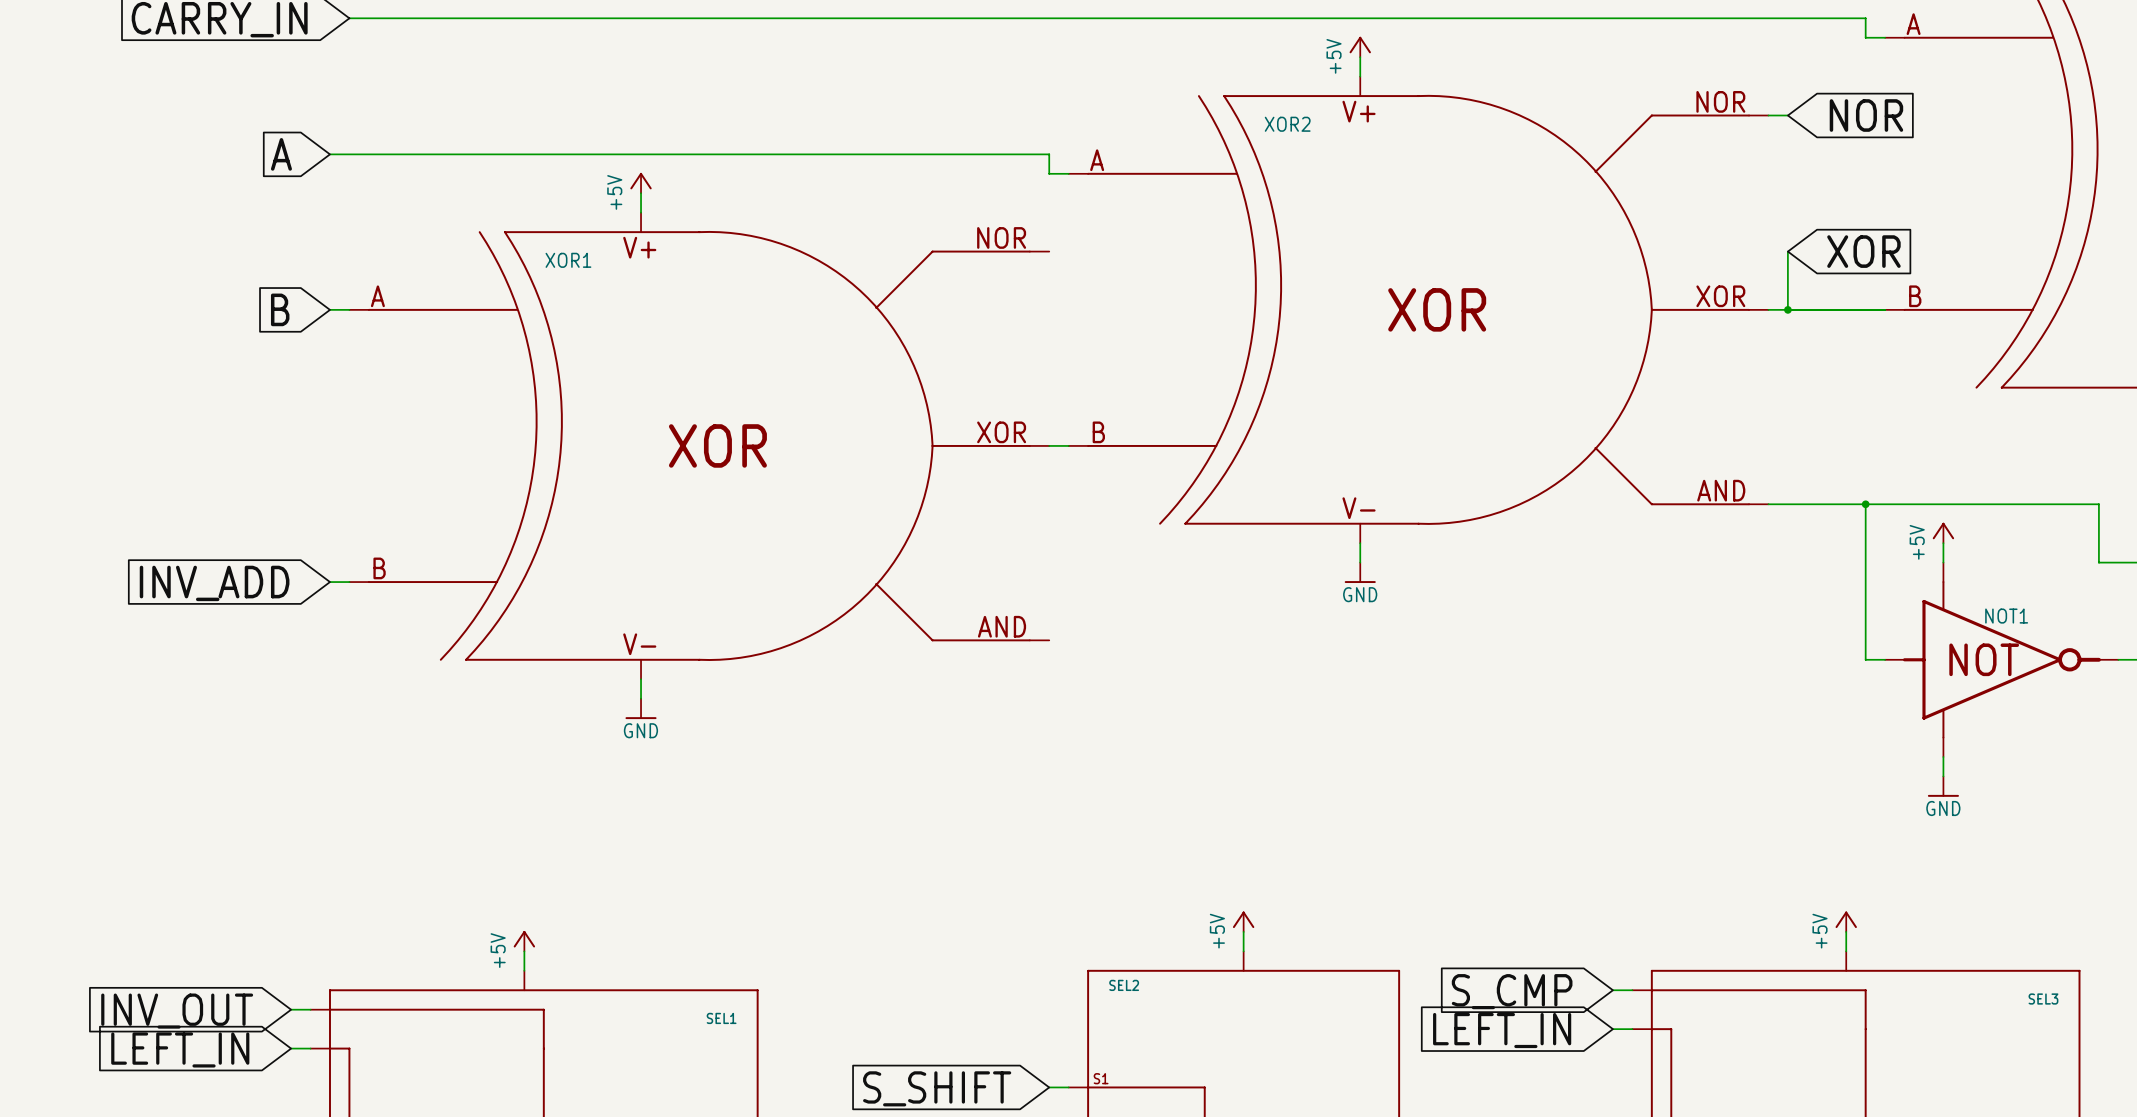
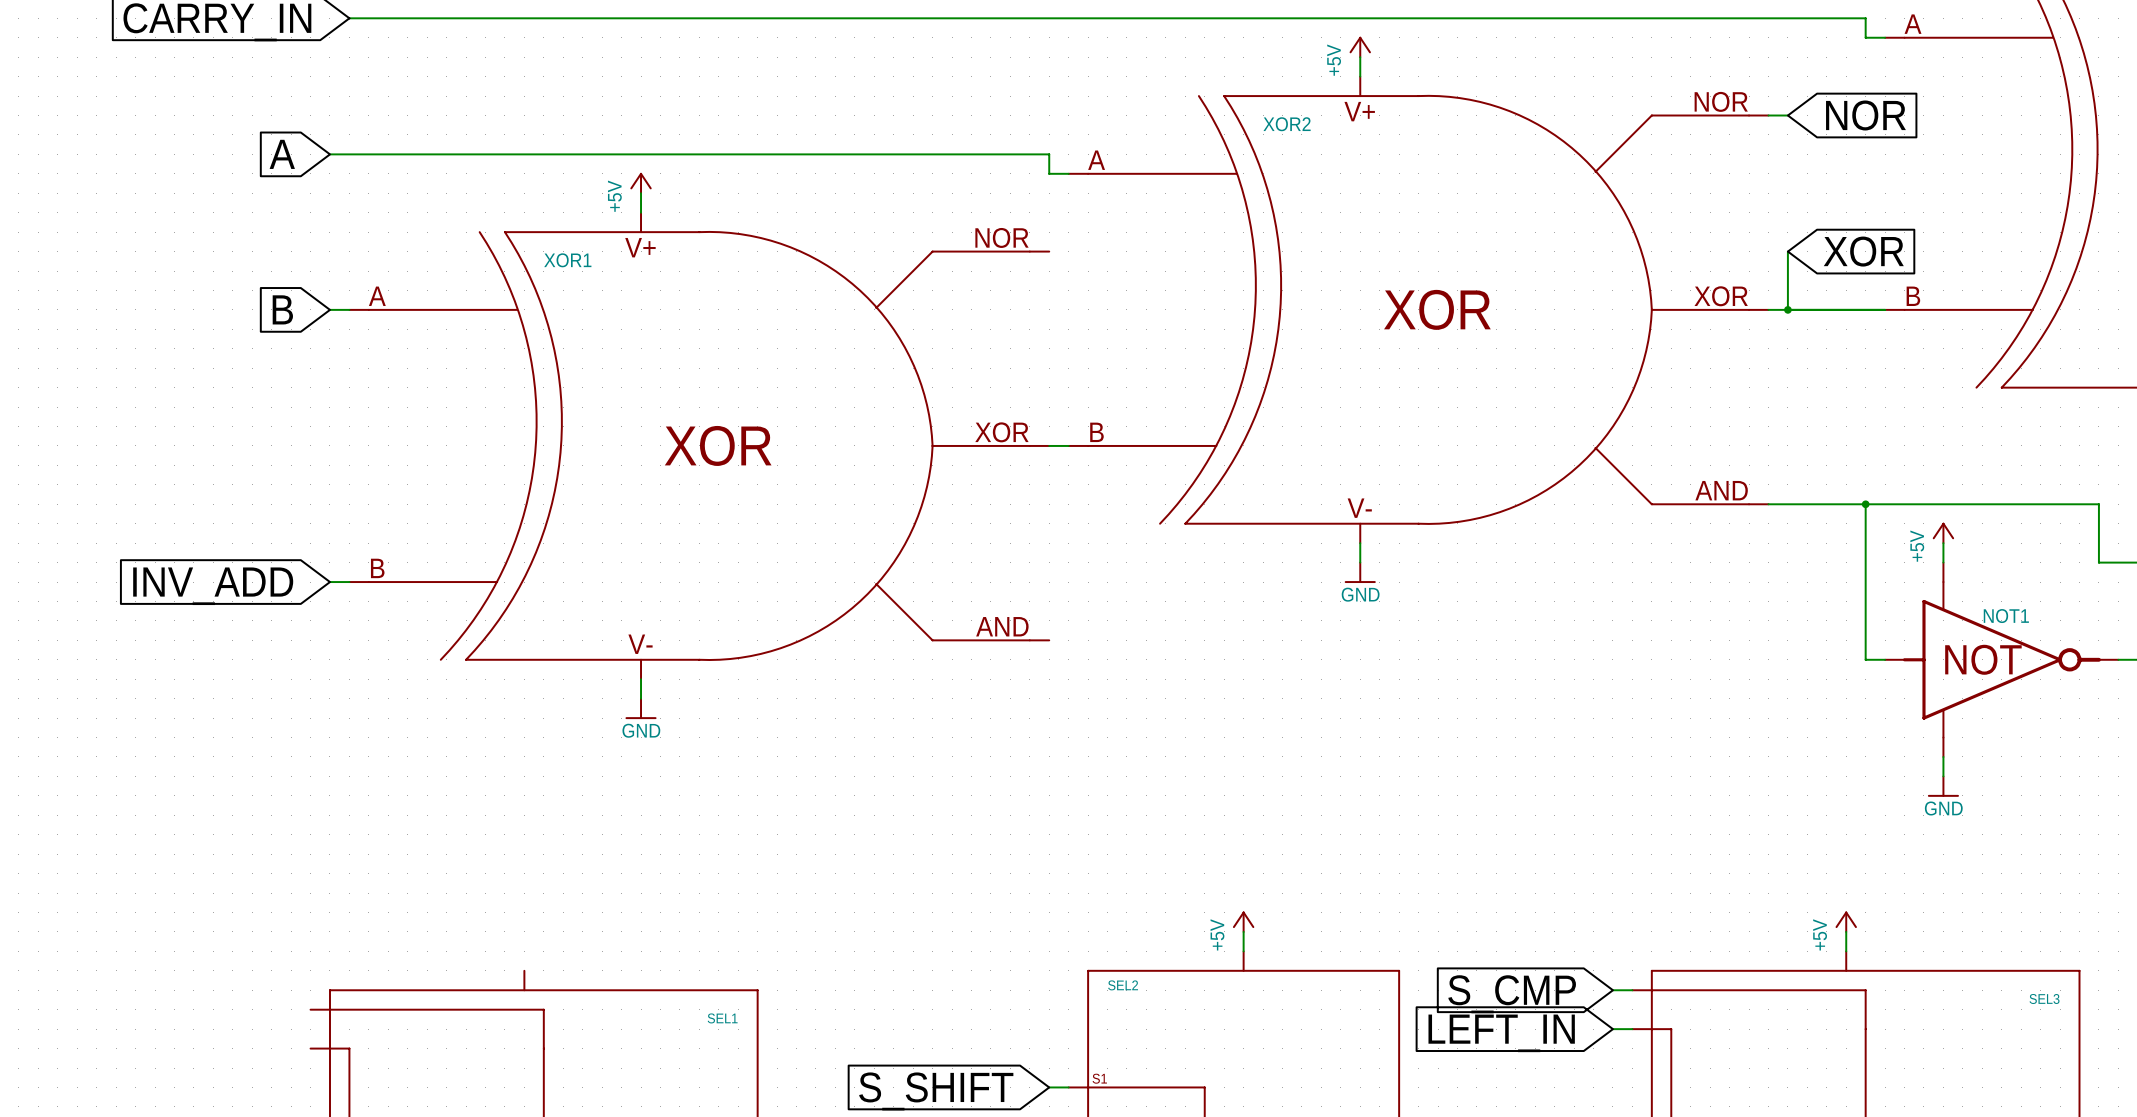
power symbol: +5V (524, 941) -> none
wire: (524, 951) (524, 970) -> none
wire: (291, 1009) (310, 1009) -> none
global label: INV_OUT (177, 1011) -> none
wire: (291, 1048) (310, 1048) -> none
global label: LEFT_IN (180, 1049) -> none

